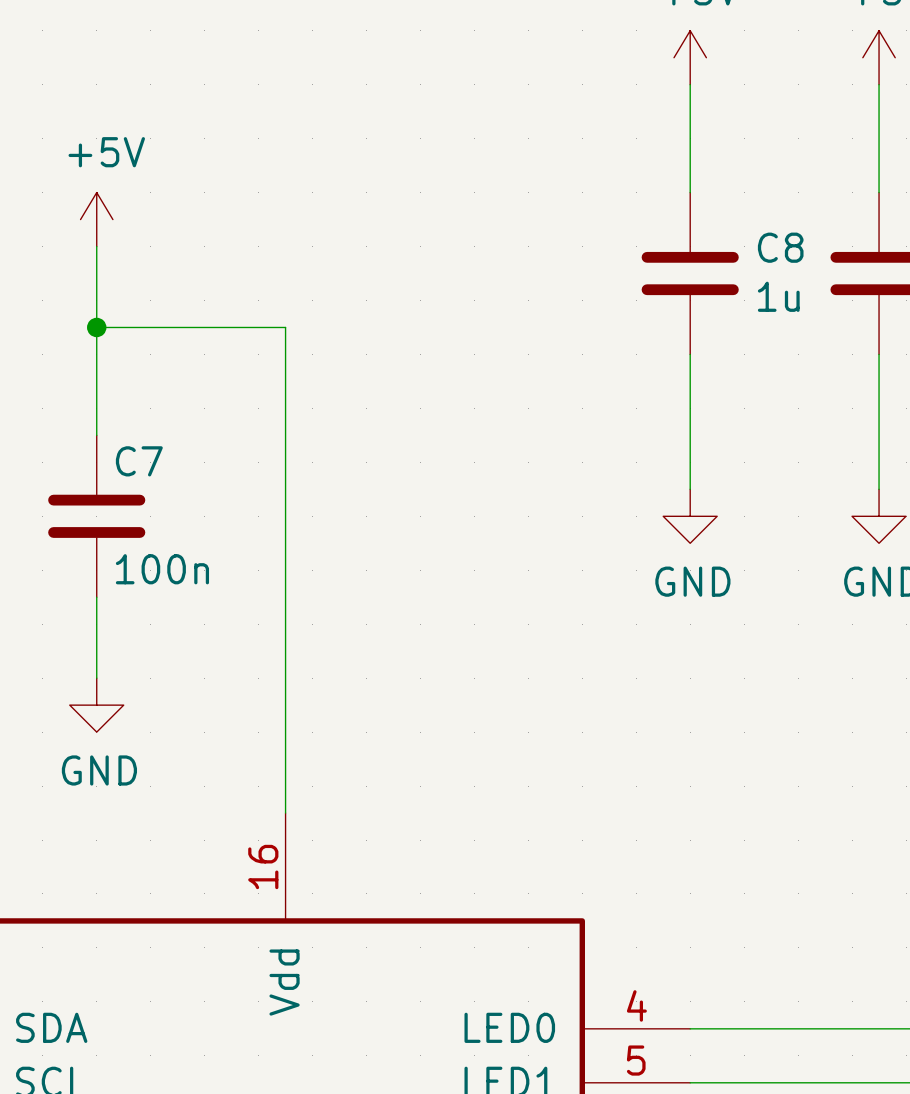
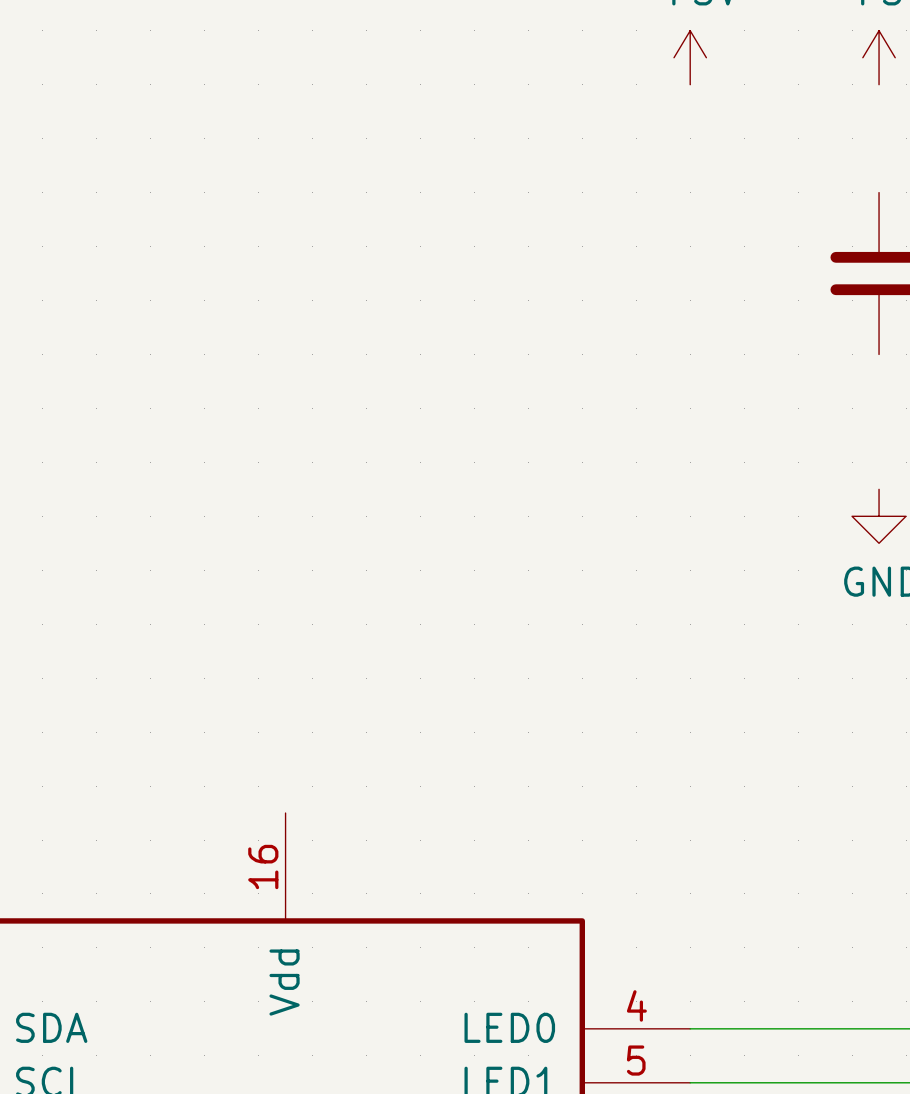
wire: (690, 84) (690, 192) -> none
wire: (879, 84) (879, 192) -> none
power symbol: +5V (96, 219) -> none
wire: (96, 246) (96, 435) -> none
C8: 1u (690, 273) -> none
wire: (96, 327) (285, 327) (285, 813) -> none
junction: (96, 327) -> none
wire: (690, 354) (690, 489) -> none
wire: (879, 354) (879, 489) -> none
C7: 100n (96, 516) -> none
power symbol: GND (690, 516) -> none
wire: (96, 597) (96, 678) -> none
power symbol: GND (96, 705) -> none

